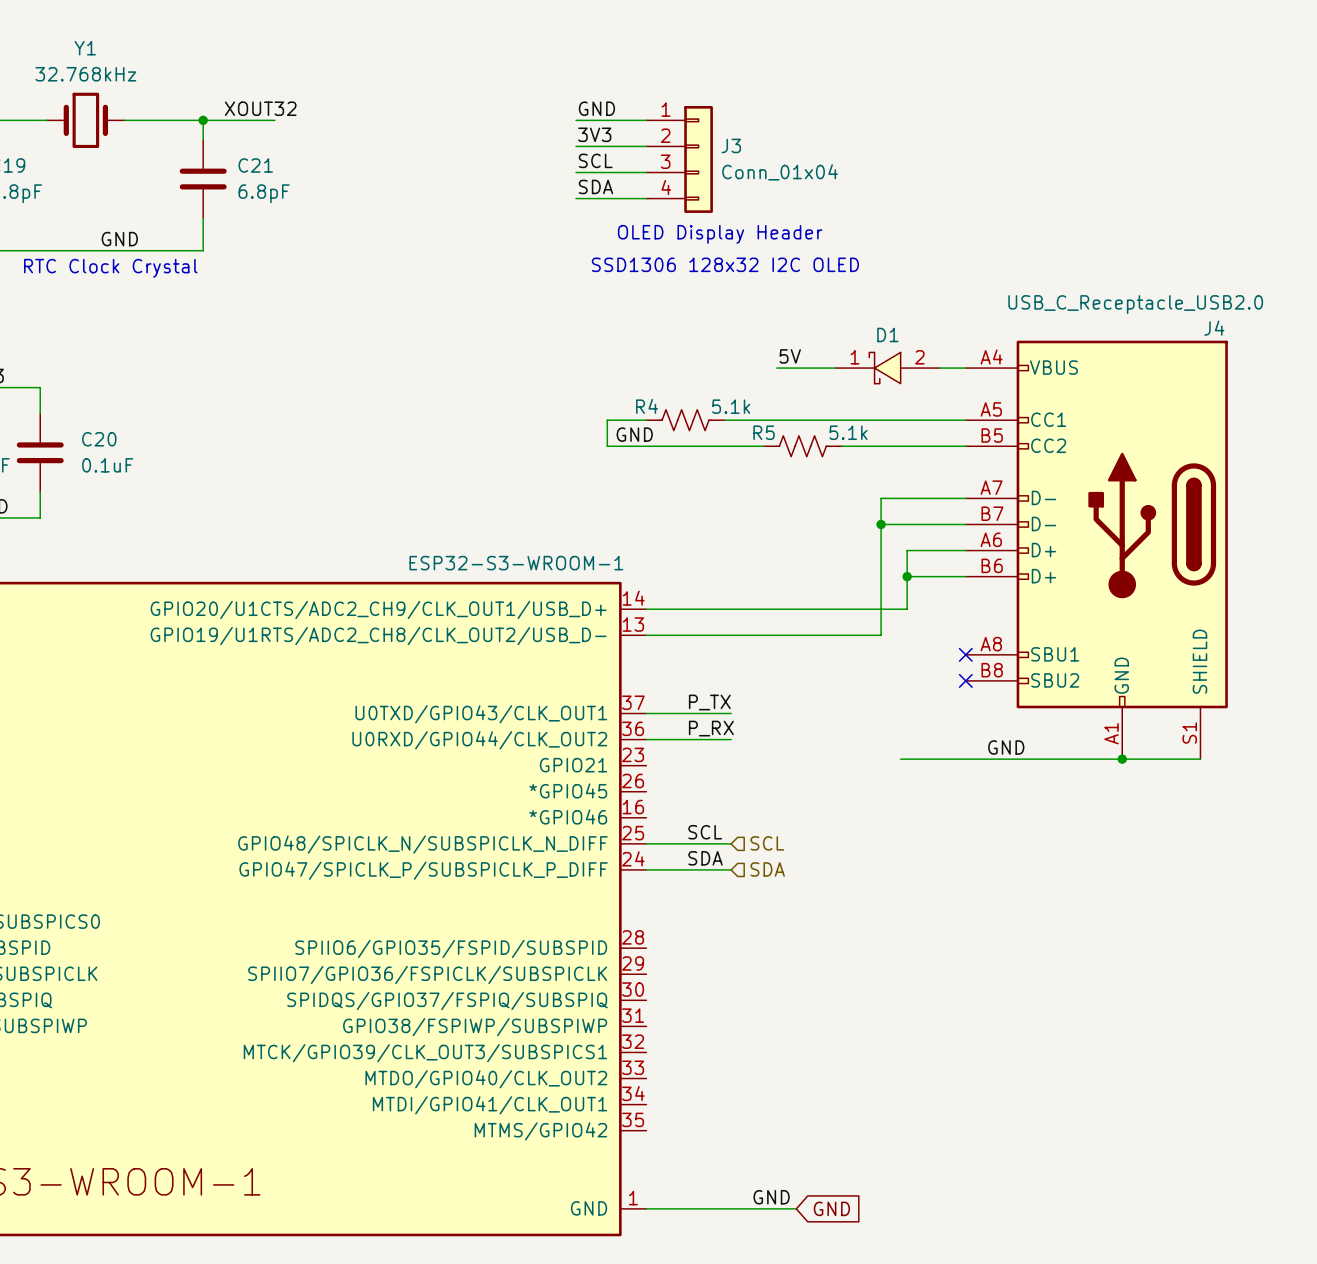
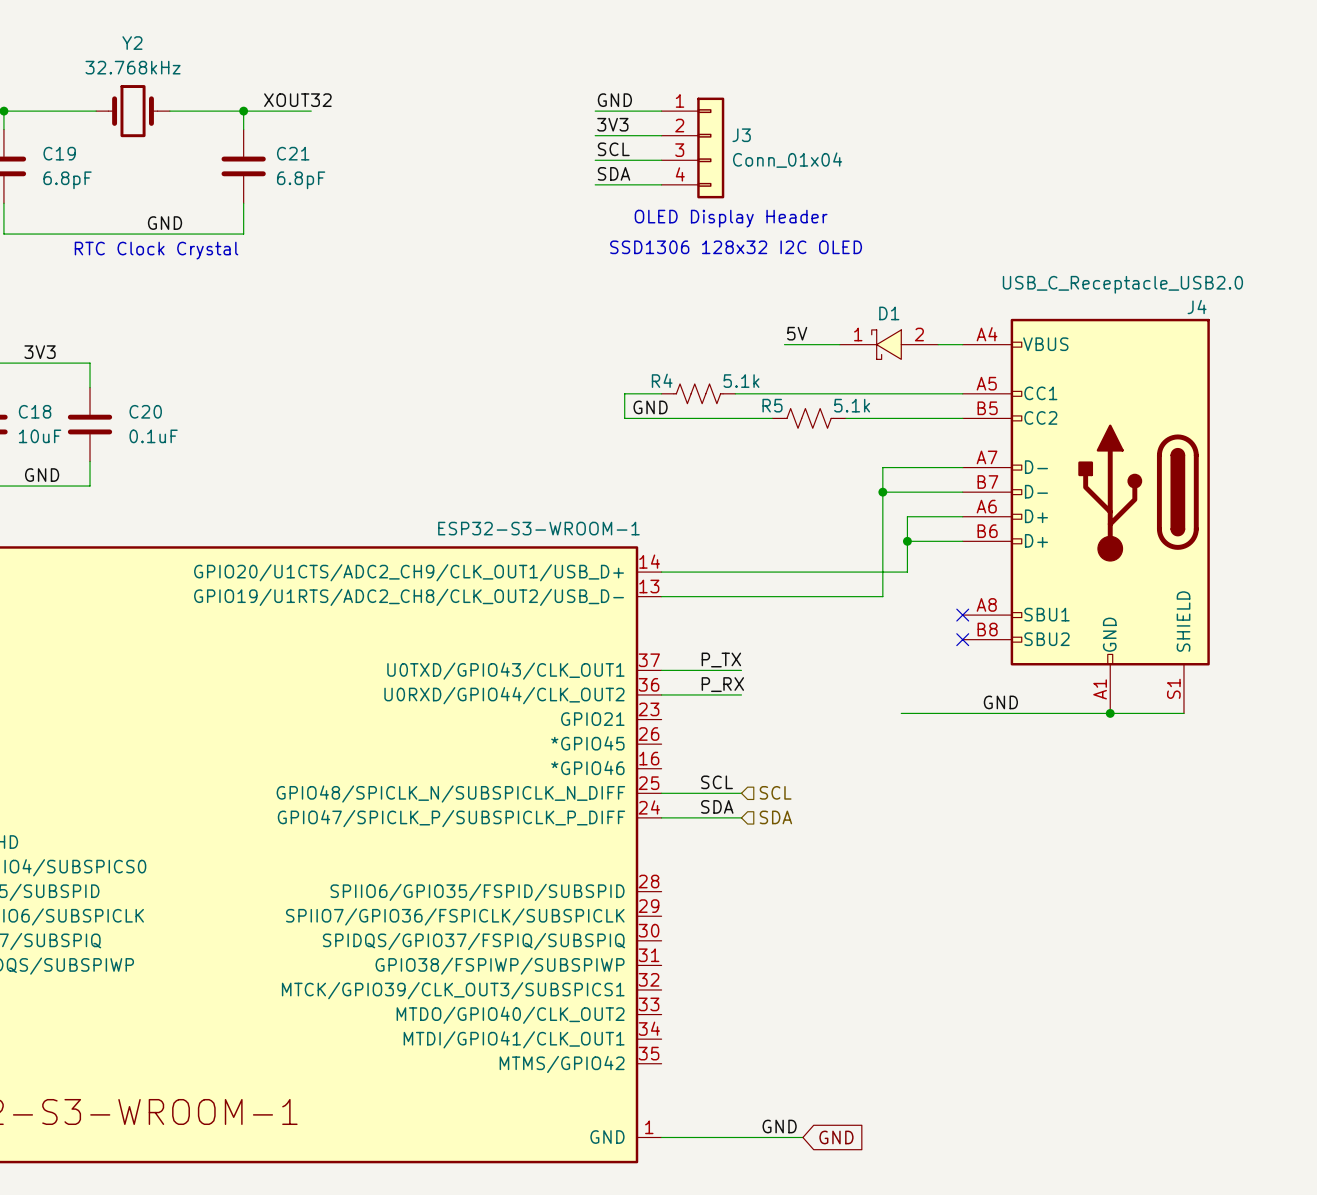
Y1 name: Y1 (85, 48) -> Y2 (132, 43)

